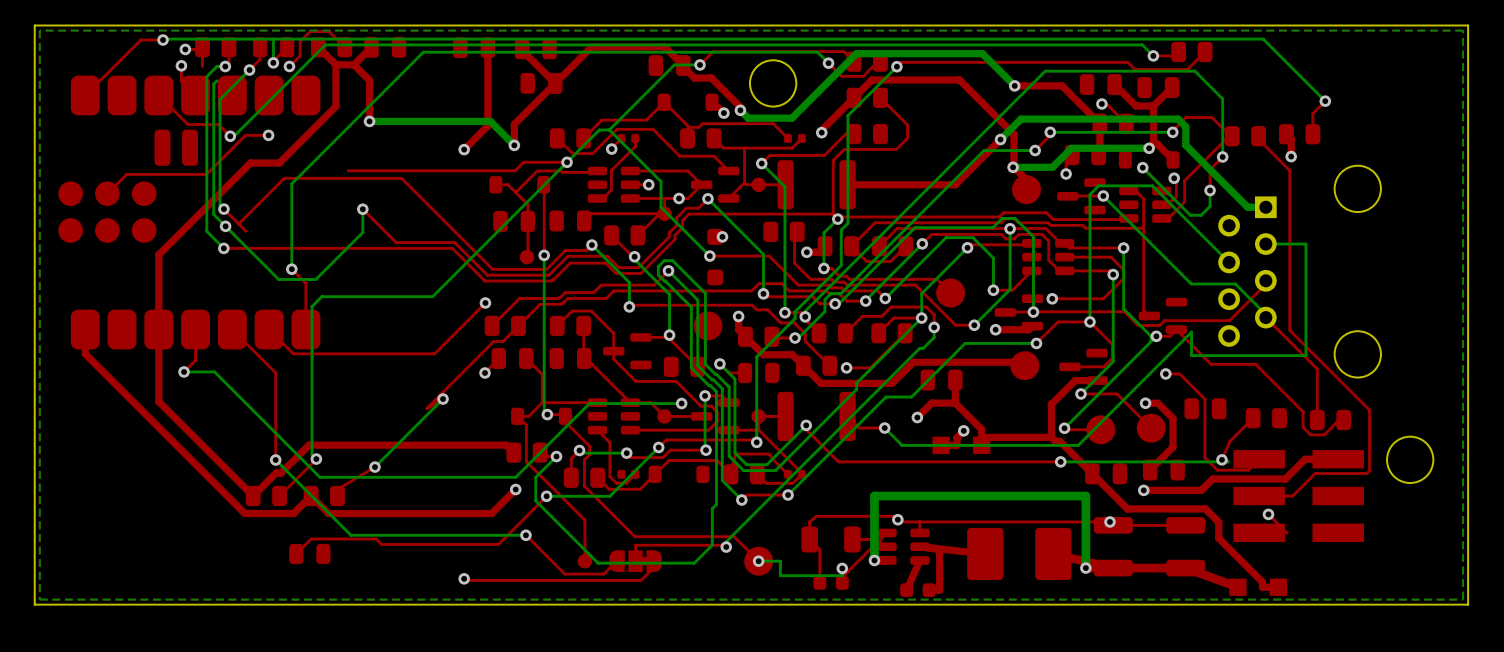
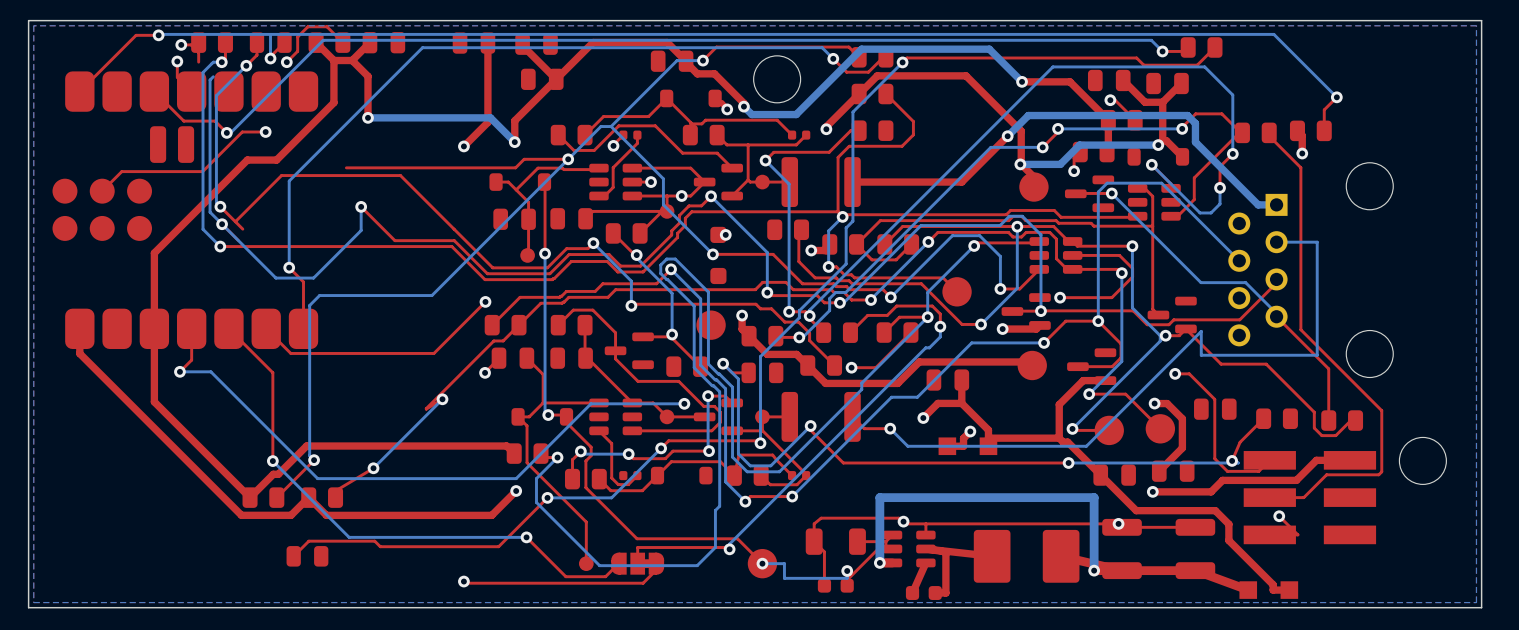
top track: (1174, 178) (1176, 180) (1176, 195) (1171, 200) -> none
via: (1174, 178) -> none

